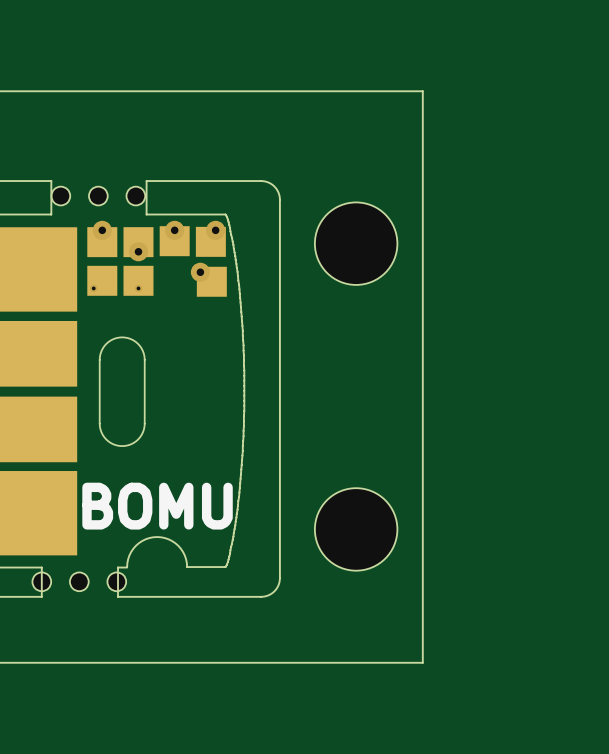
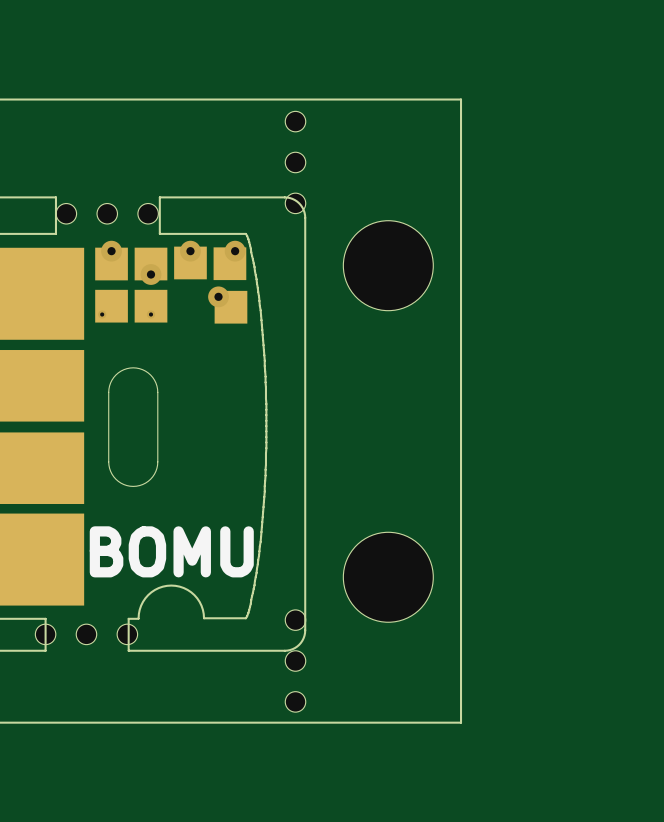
part: none -> (295, 162)
part: none -> (295, 661)

